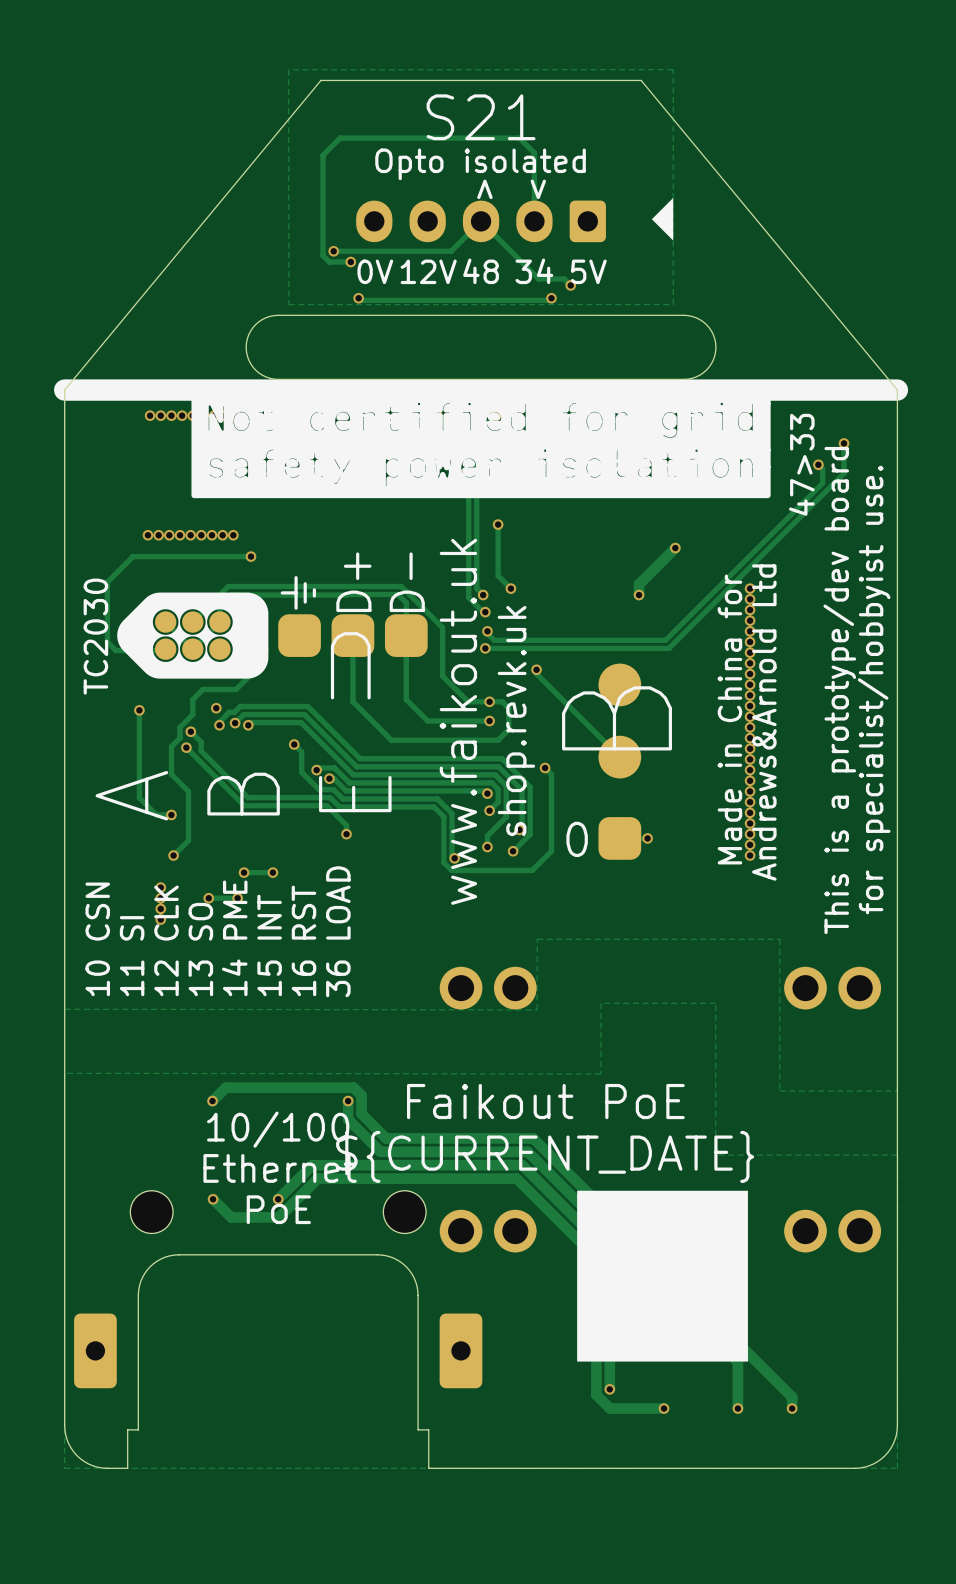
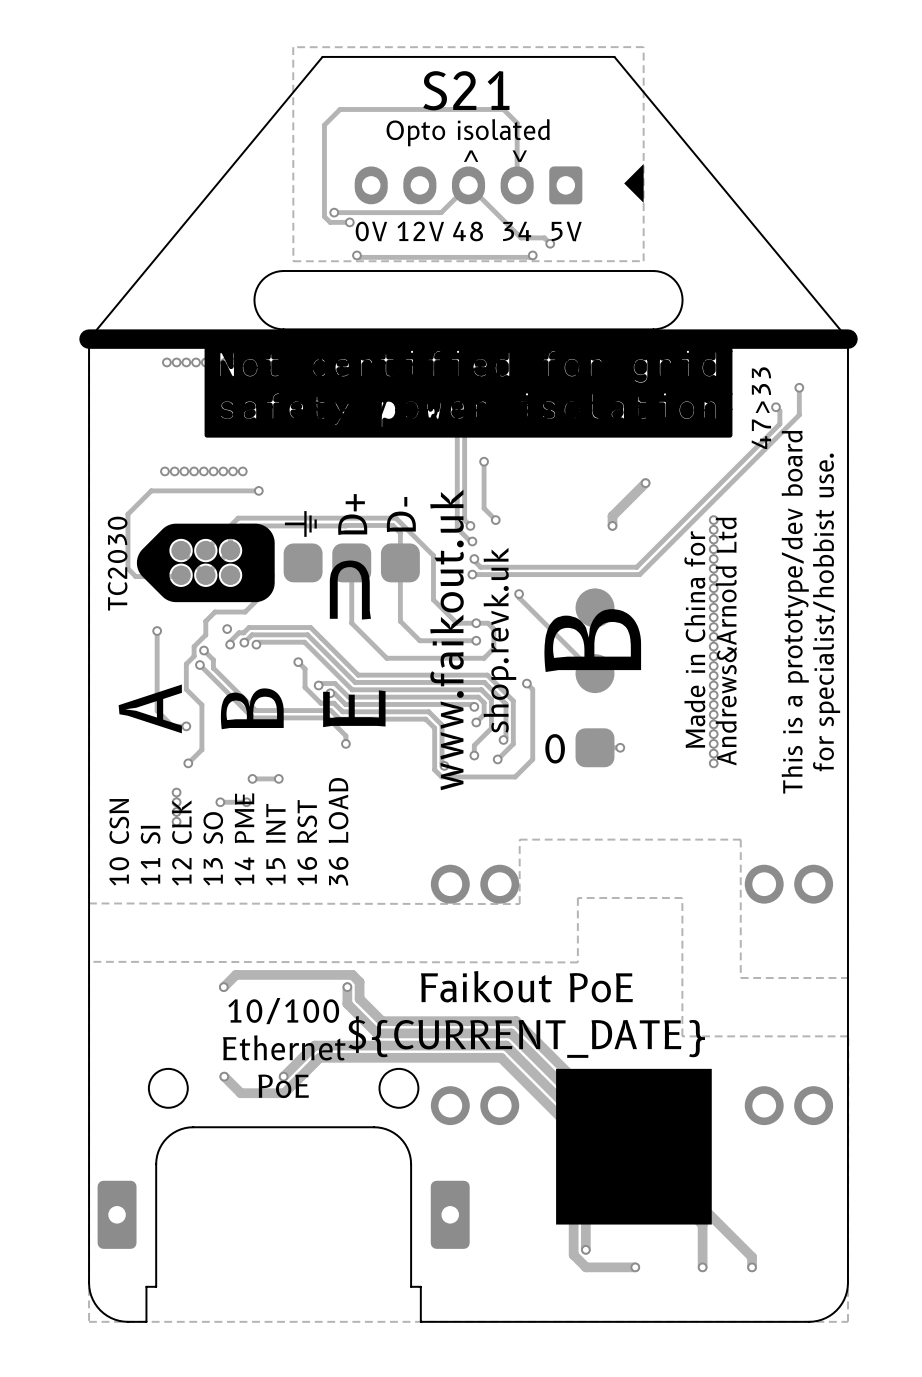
drawing: [386, 459, 401, 478] -> none
text: for specialist/hobbyist use. (874, 690) -> for specialist/hobbist use. (826, 612)

